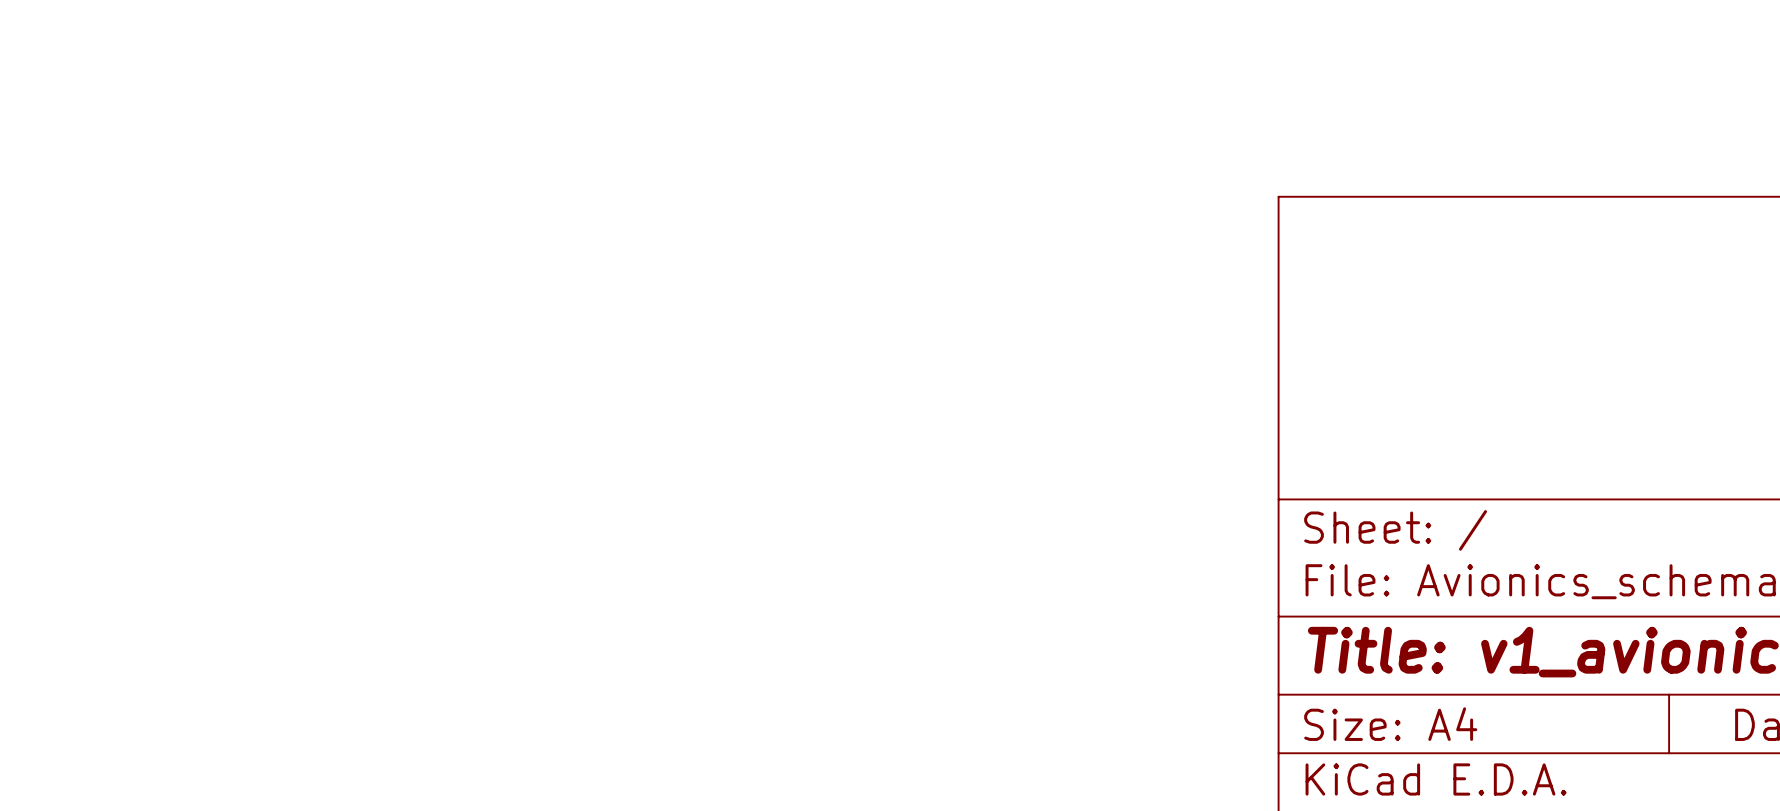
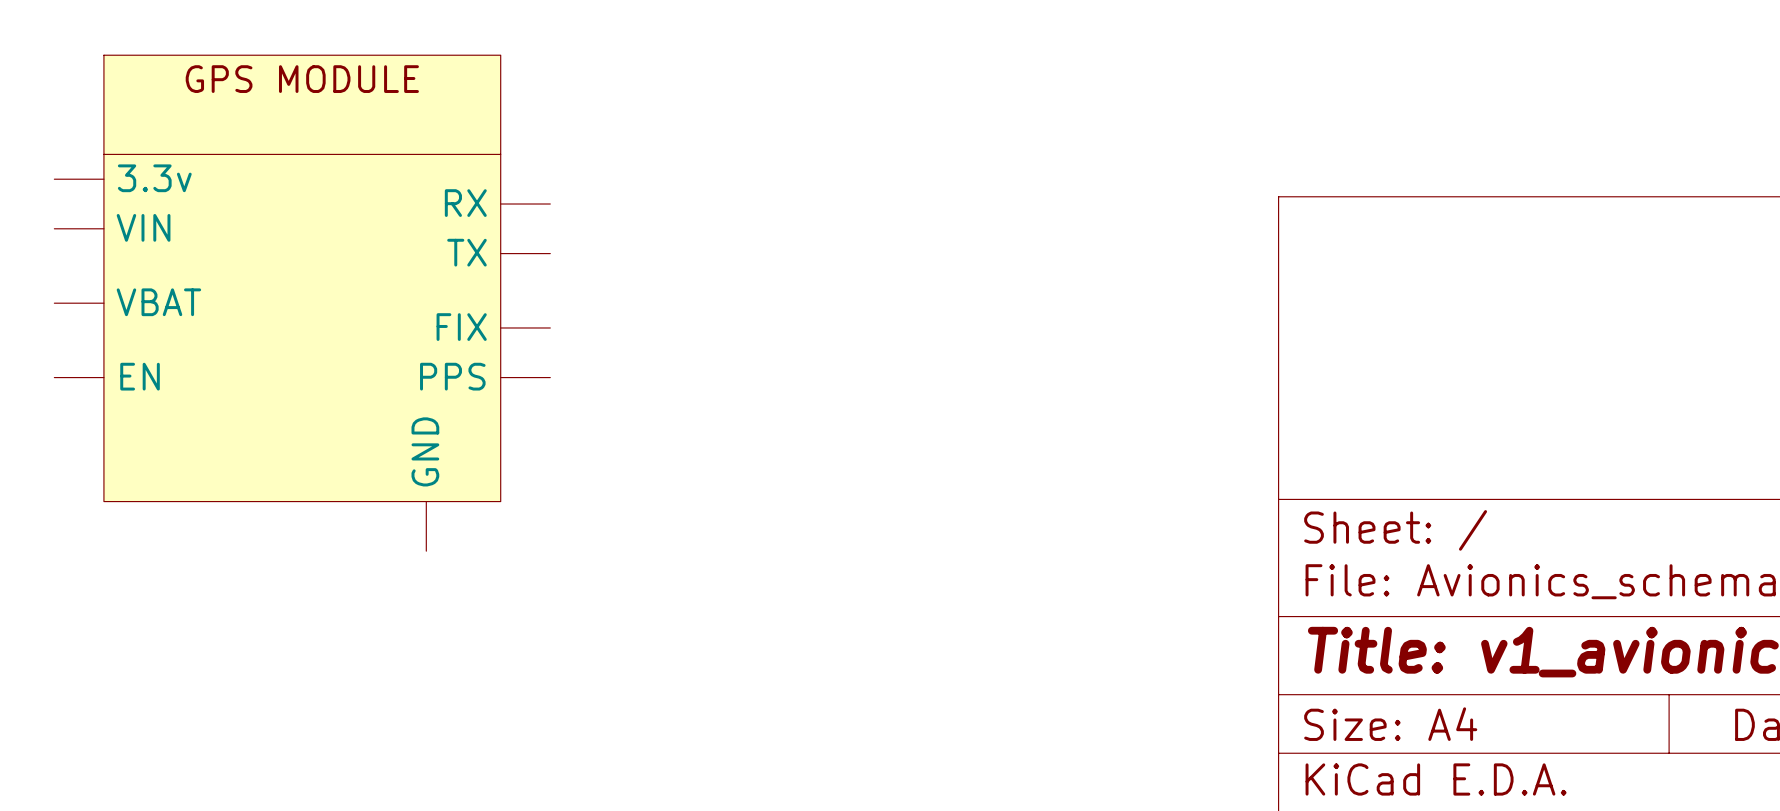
part: none -> (302, 303)

